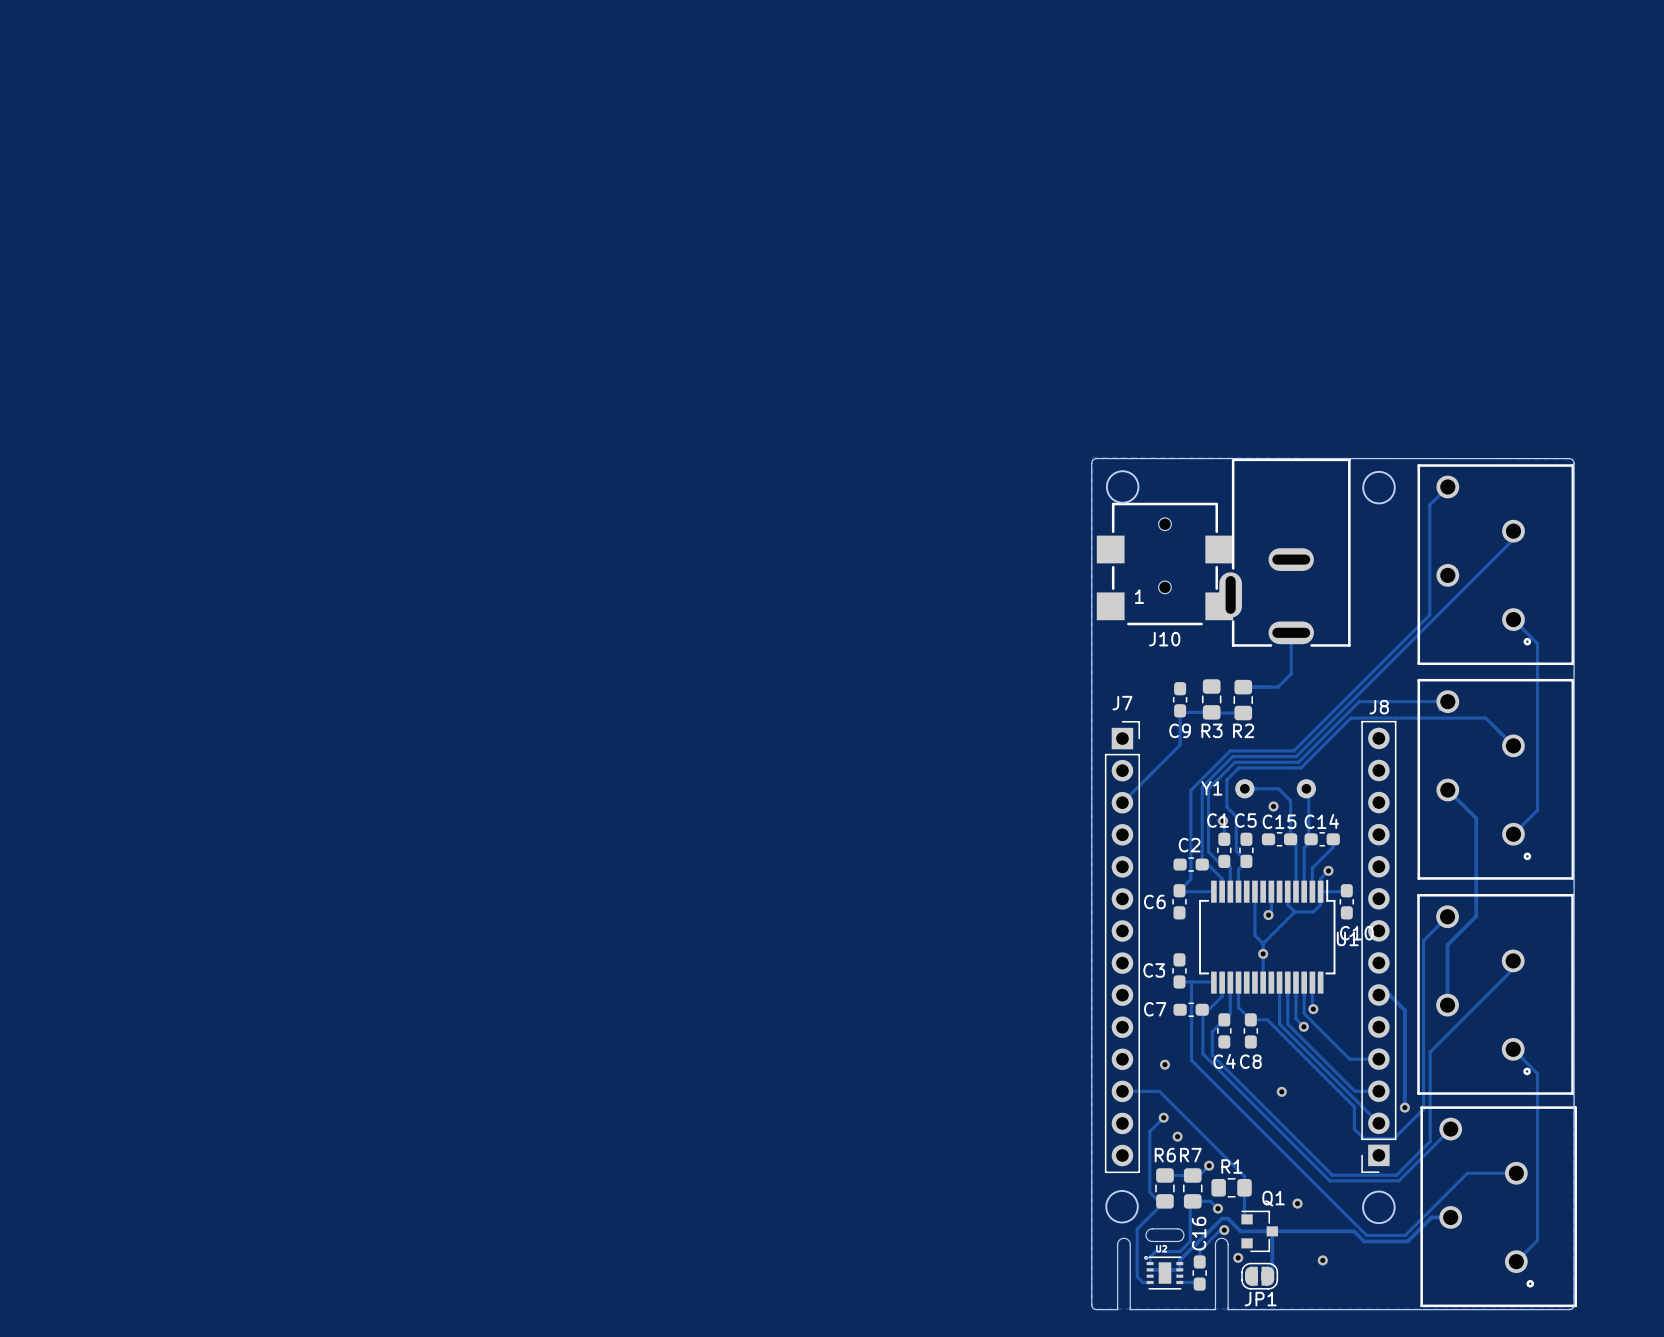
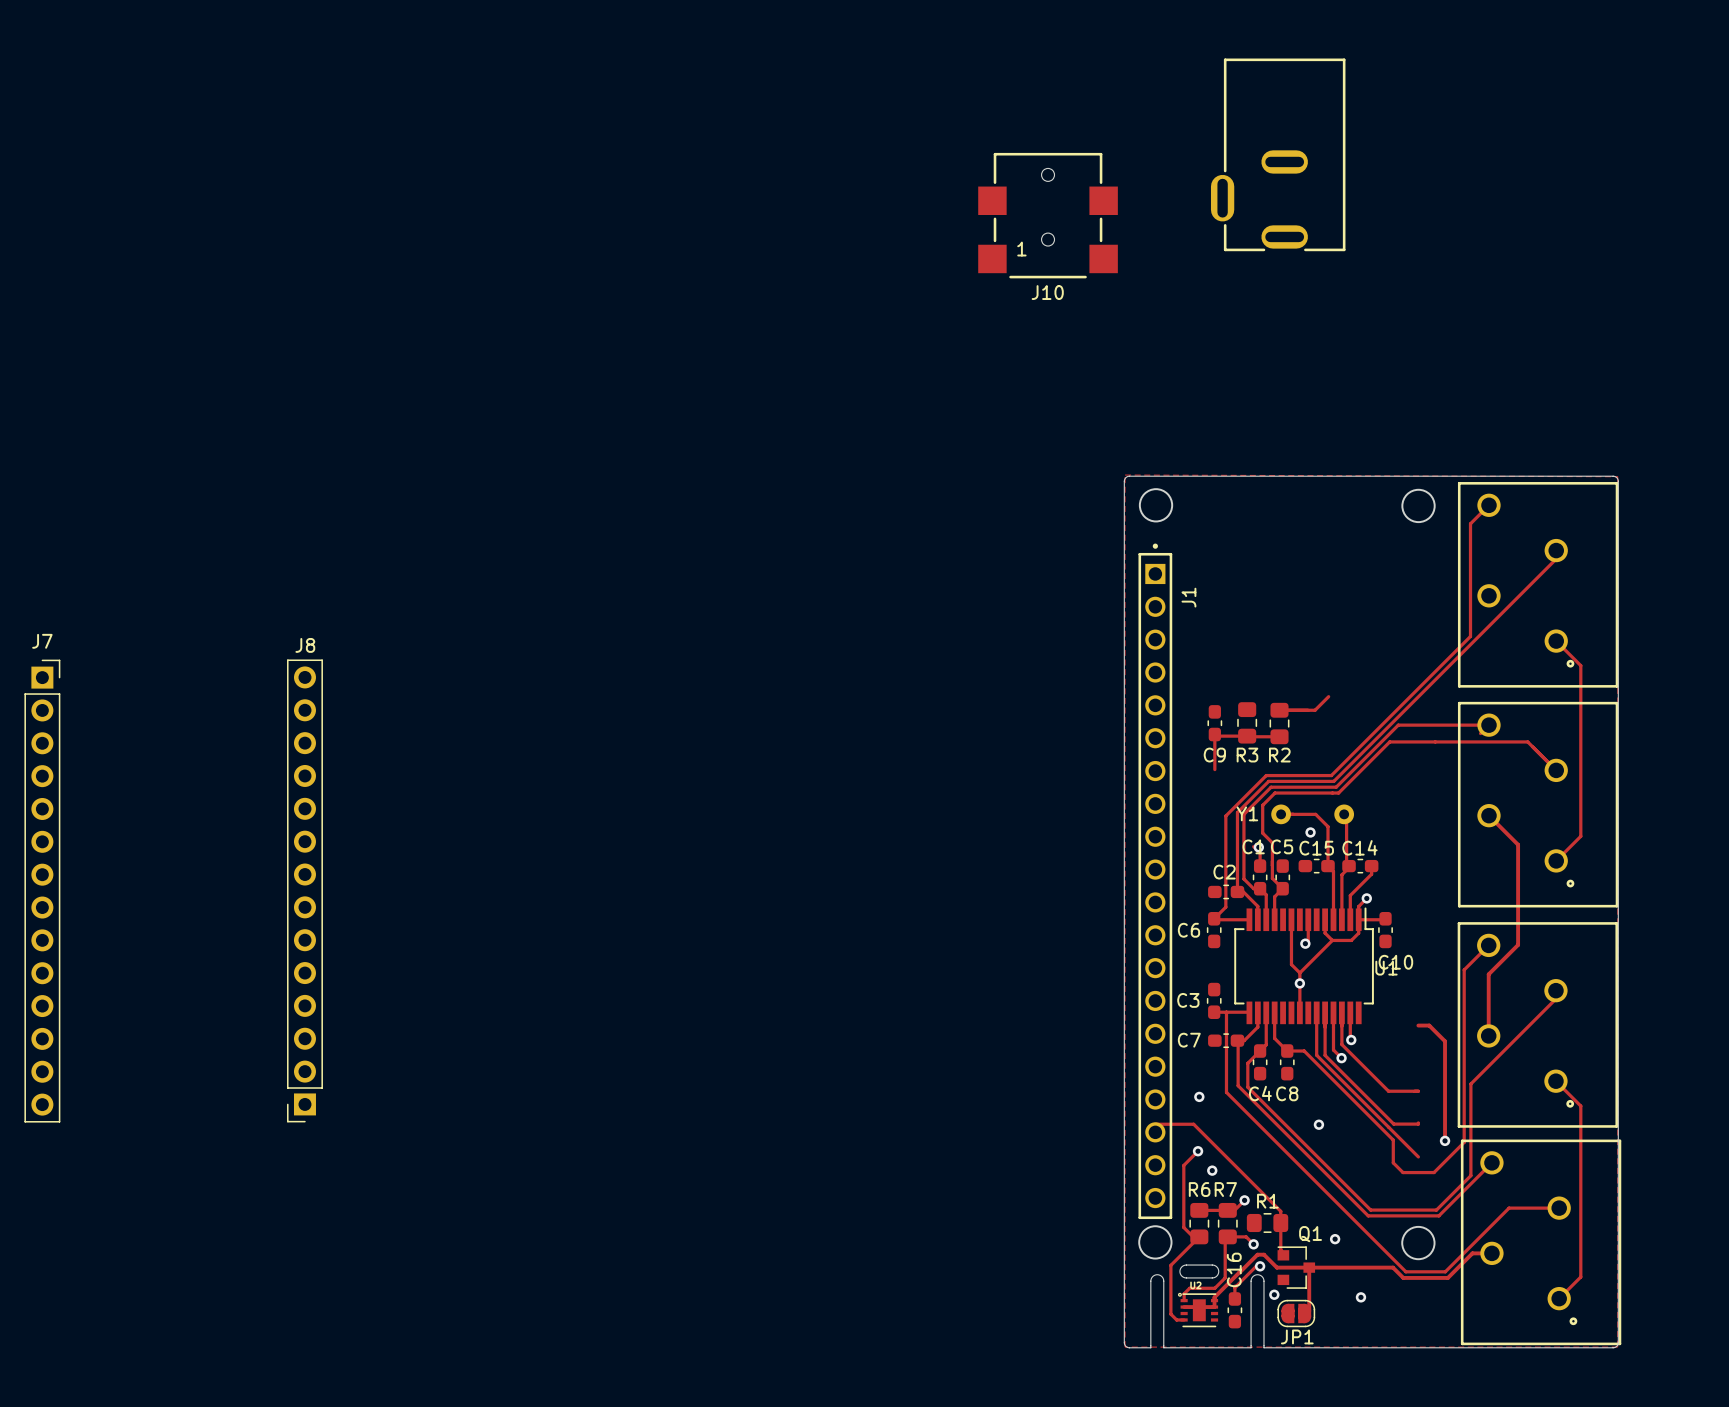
part: none -> (1278, 154)
part: (1284, 552) -> none
J10 position: (1164, 564) -> (1048, 215)
track: (1291, 632) (1291, 673) -> none
track: (1180, 745) (1122, 802) -> none
J1: none -> (1155, 881)
J8 position: (1378, 946) -> (304, 890)
J7 position: (1122, 947) -> (42, 891)
track: (1179, 1282) (1198, 1282) -> none

